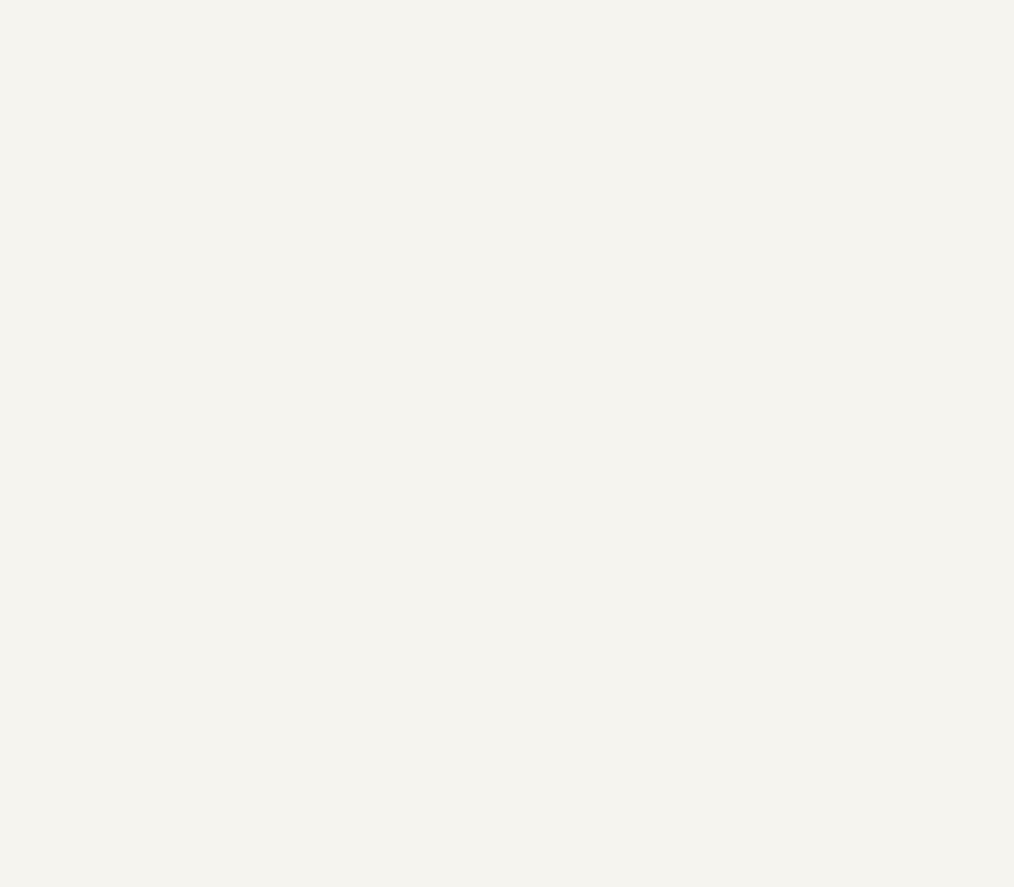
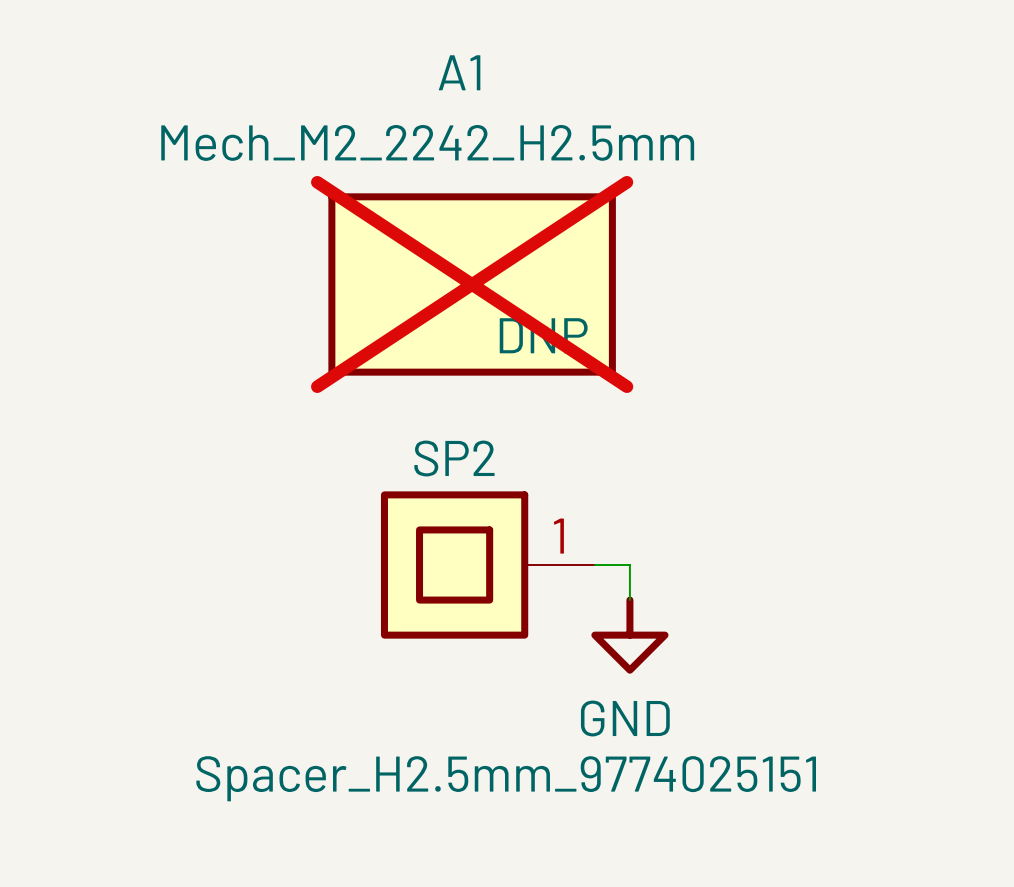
A1: none -> Mech_M2_2242_H2.5mm (472, 284)
SP2: none -> Spacer_H2.5mm_9774025151 (487, 565)
wire: none -> (594, 565) (629, 565) (629, 600)
power symbol: none -> GND (629, 635)

